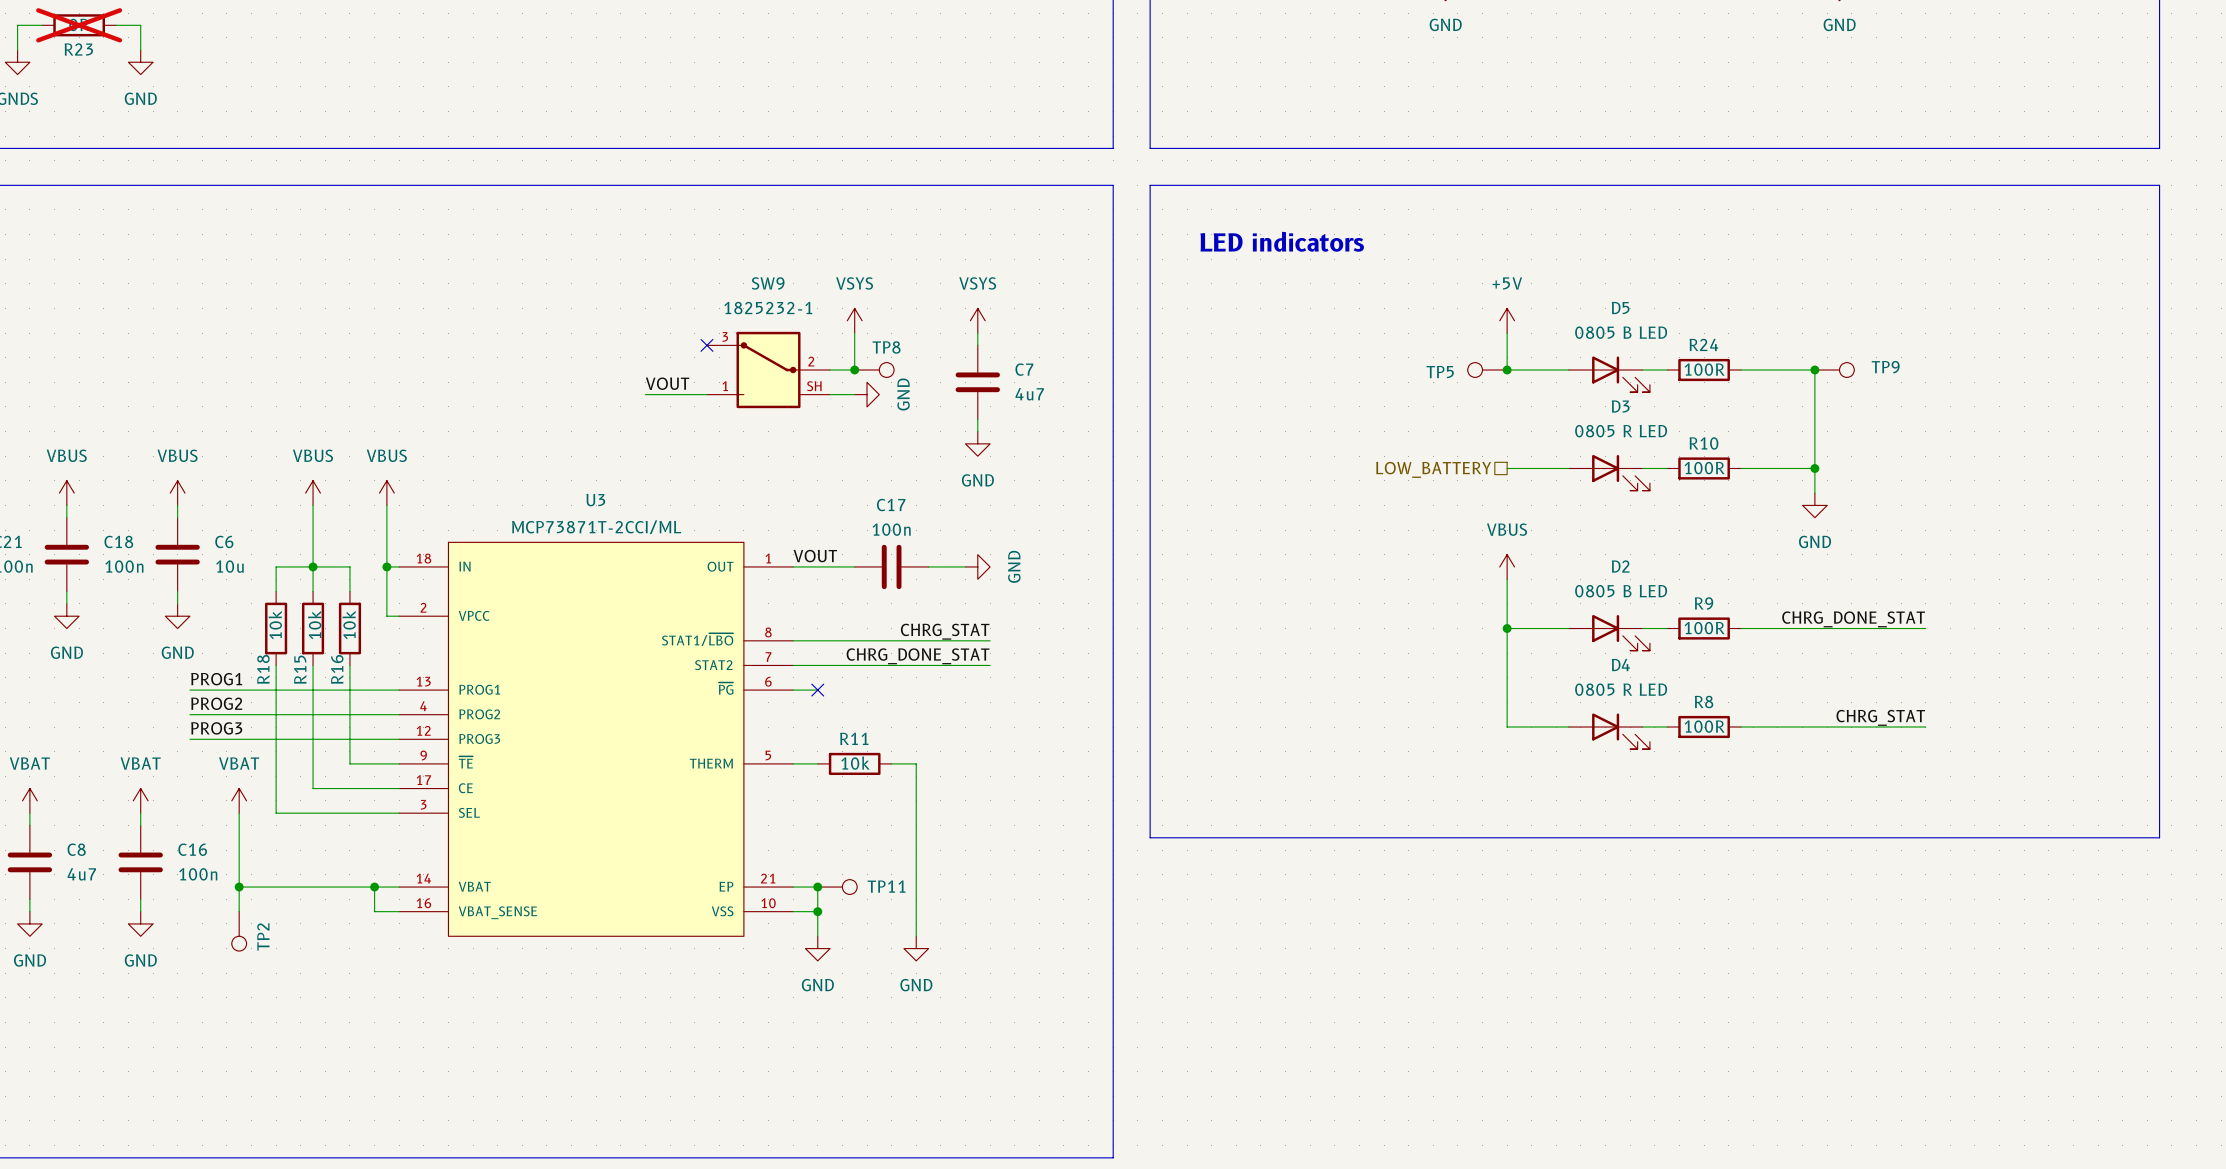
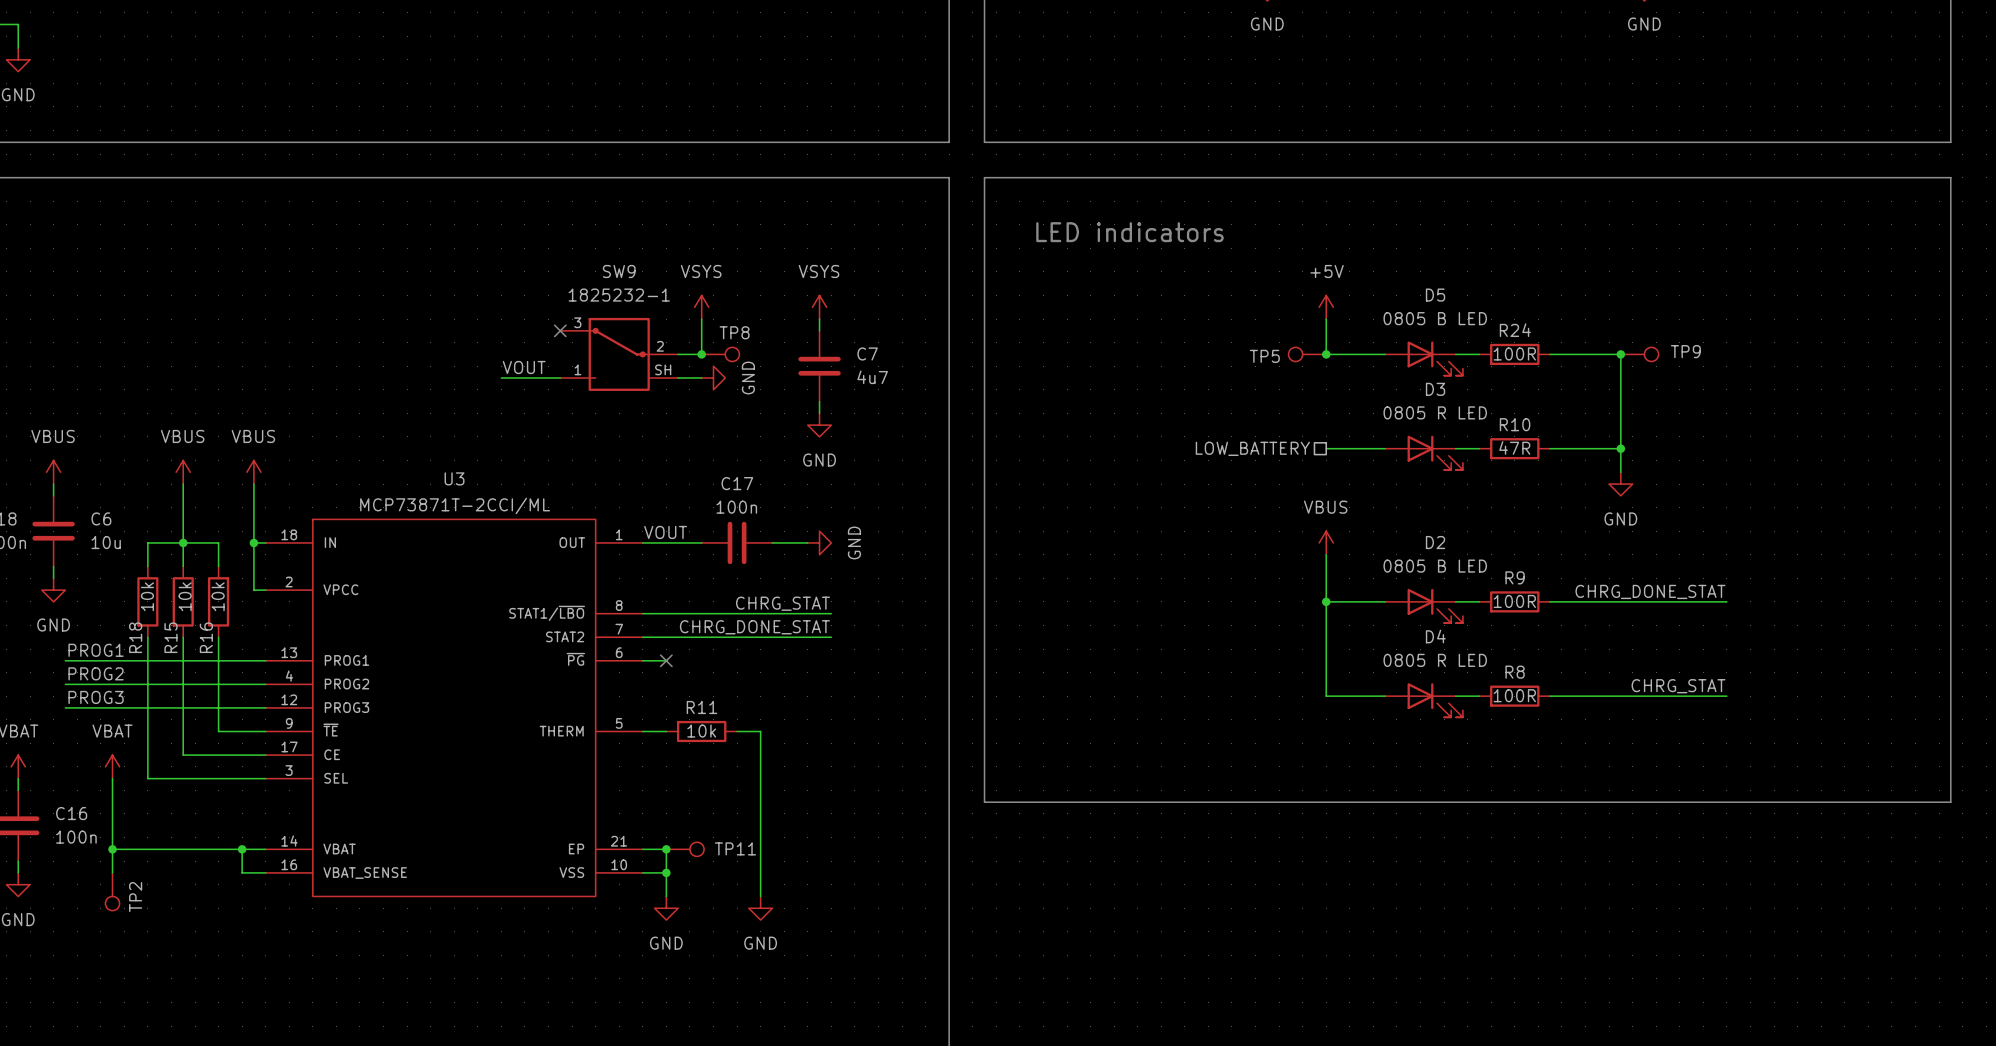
R10 value: 100R (1704, 468) -> 47R (1514, 447)

